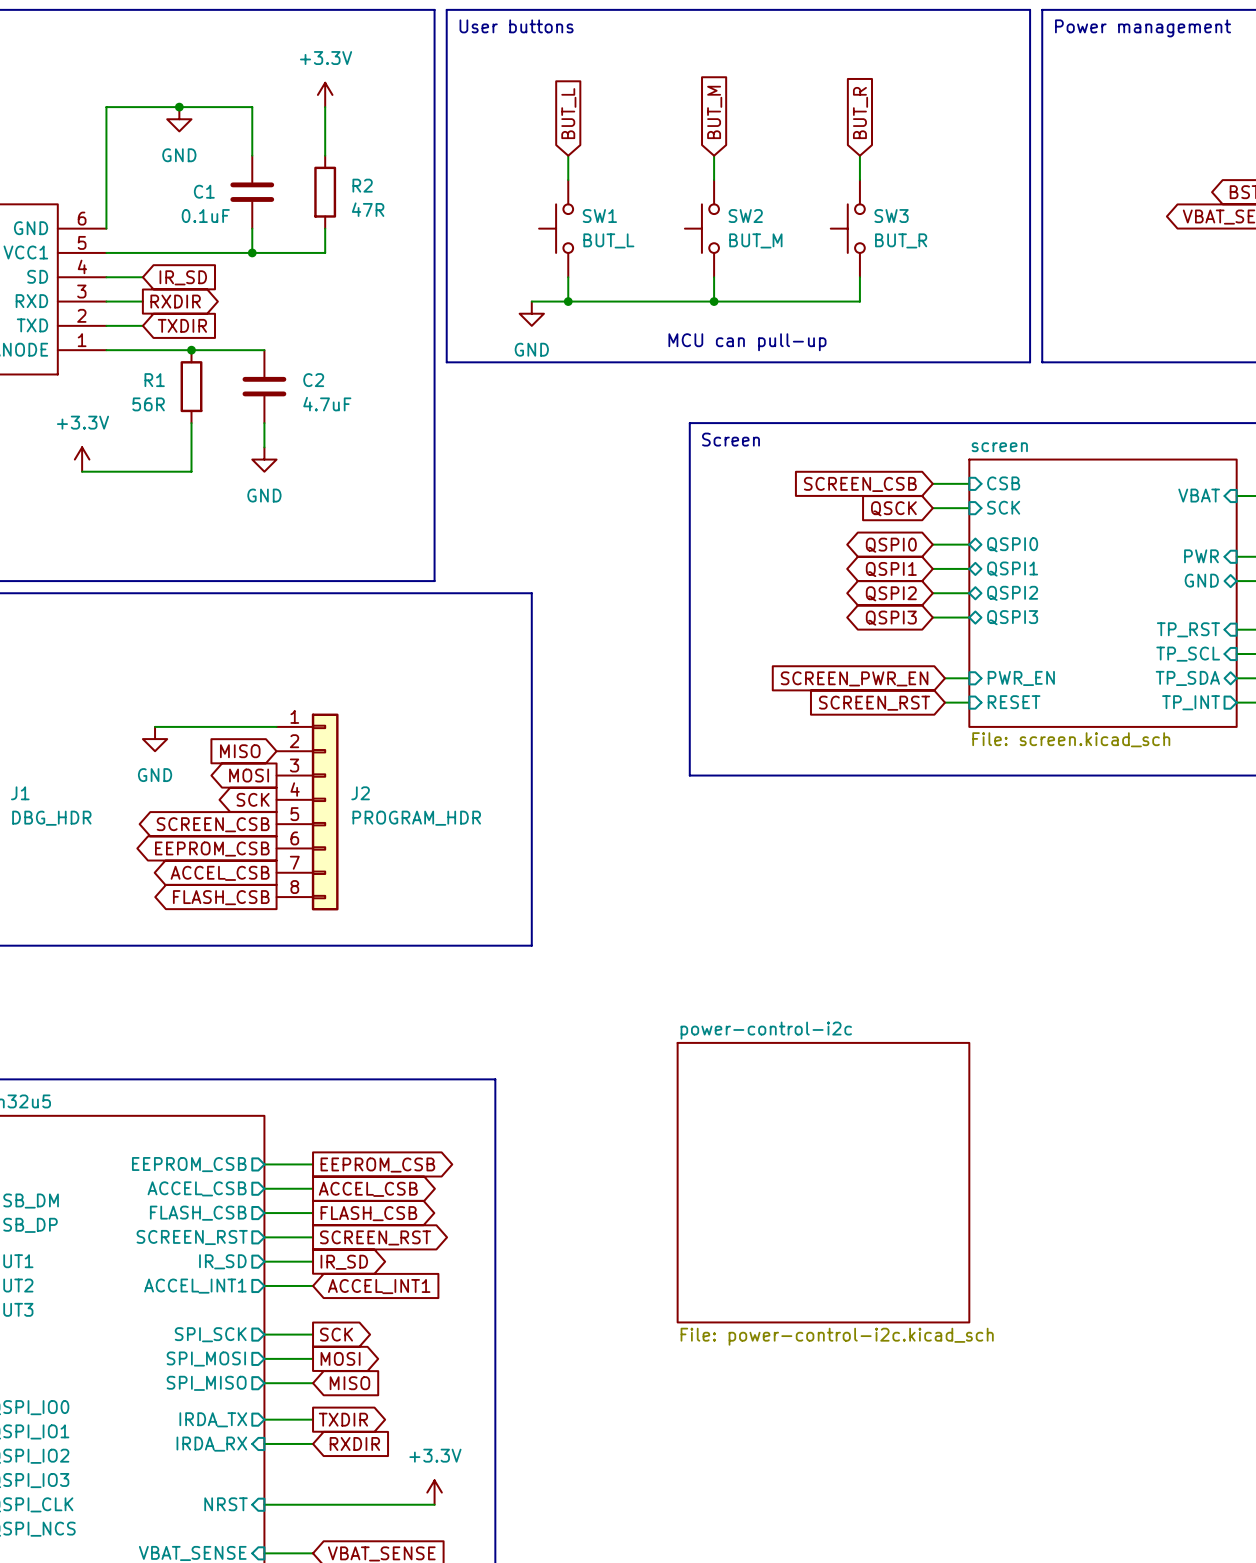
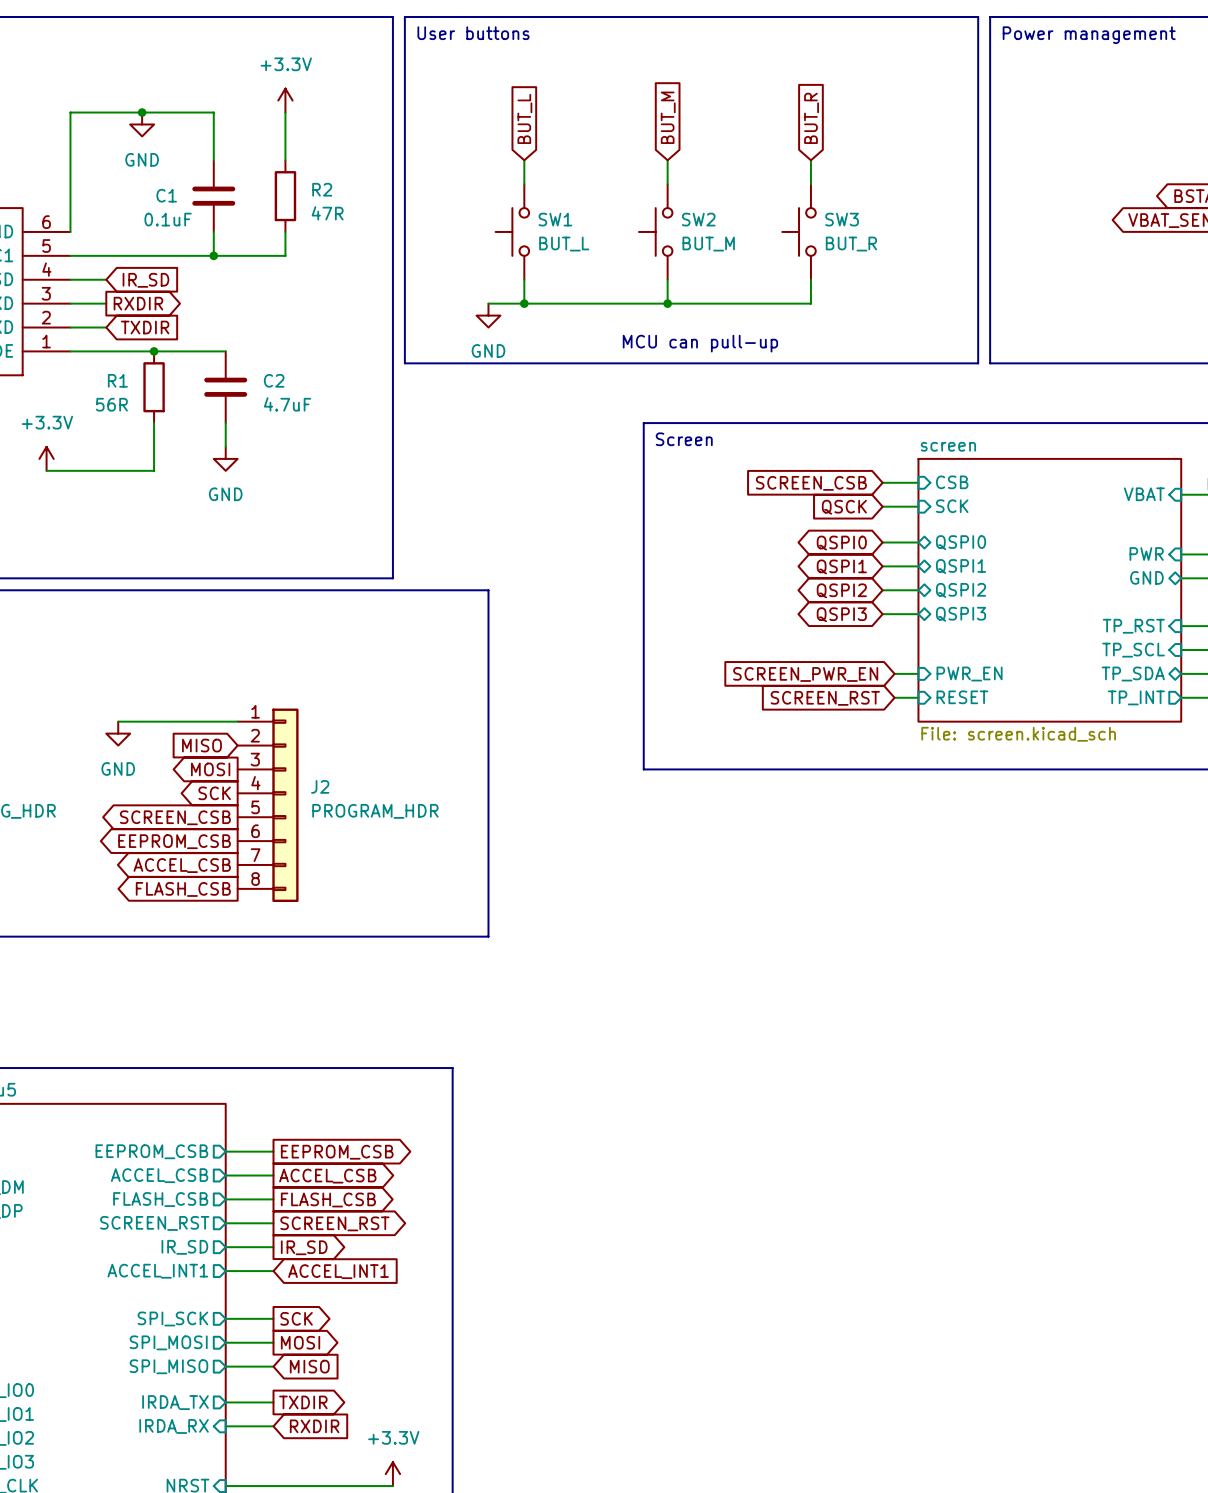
sheet power-control-i2c: File: power-control-i2c.kicad_sch (823, 1182) -> none

